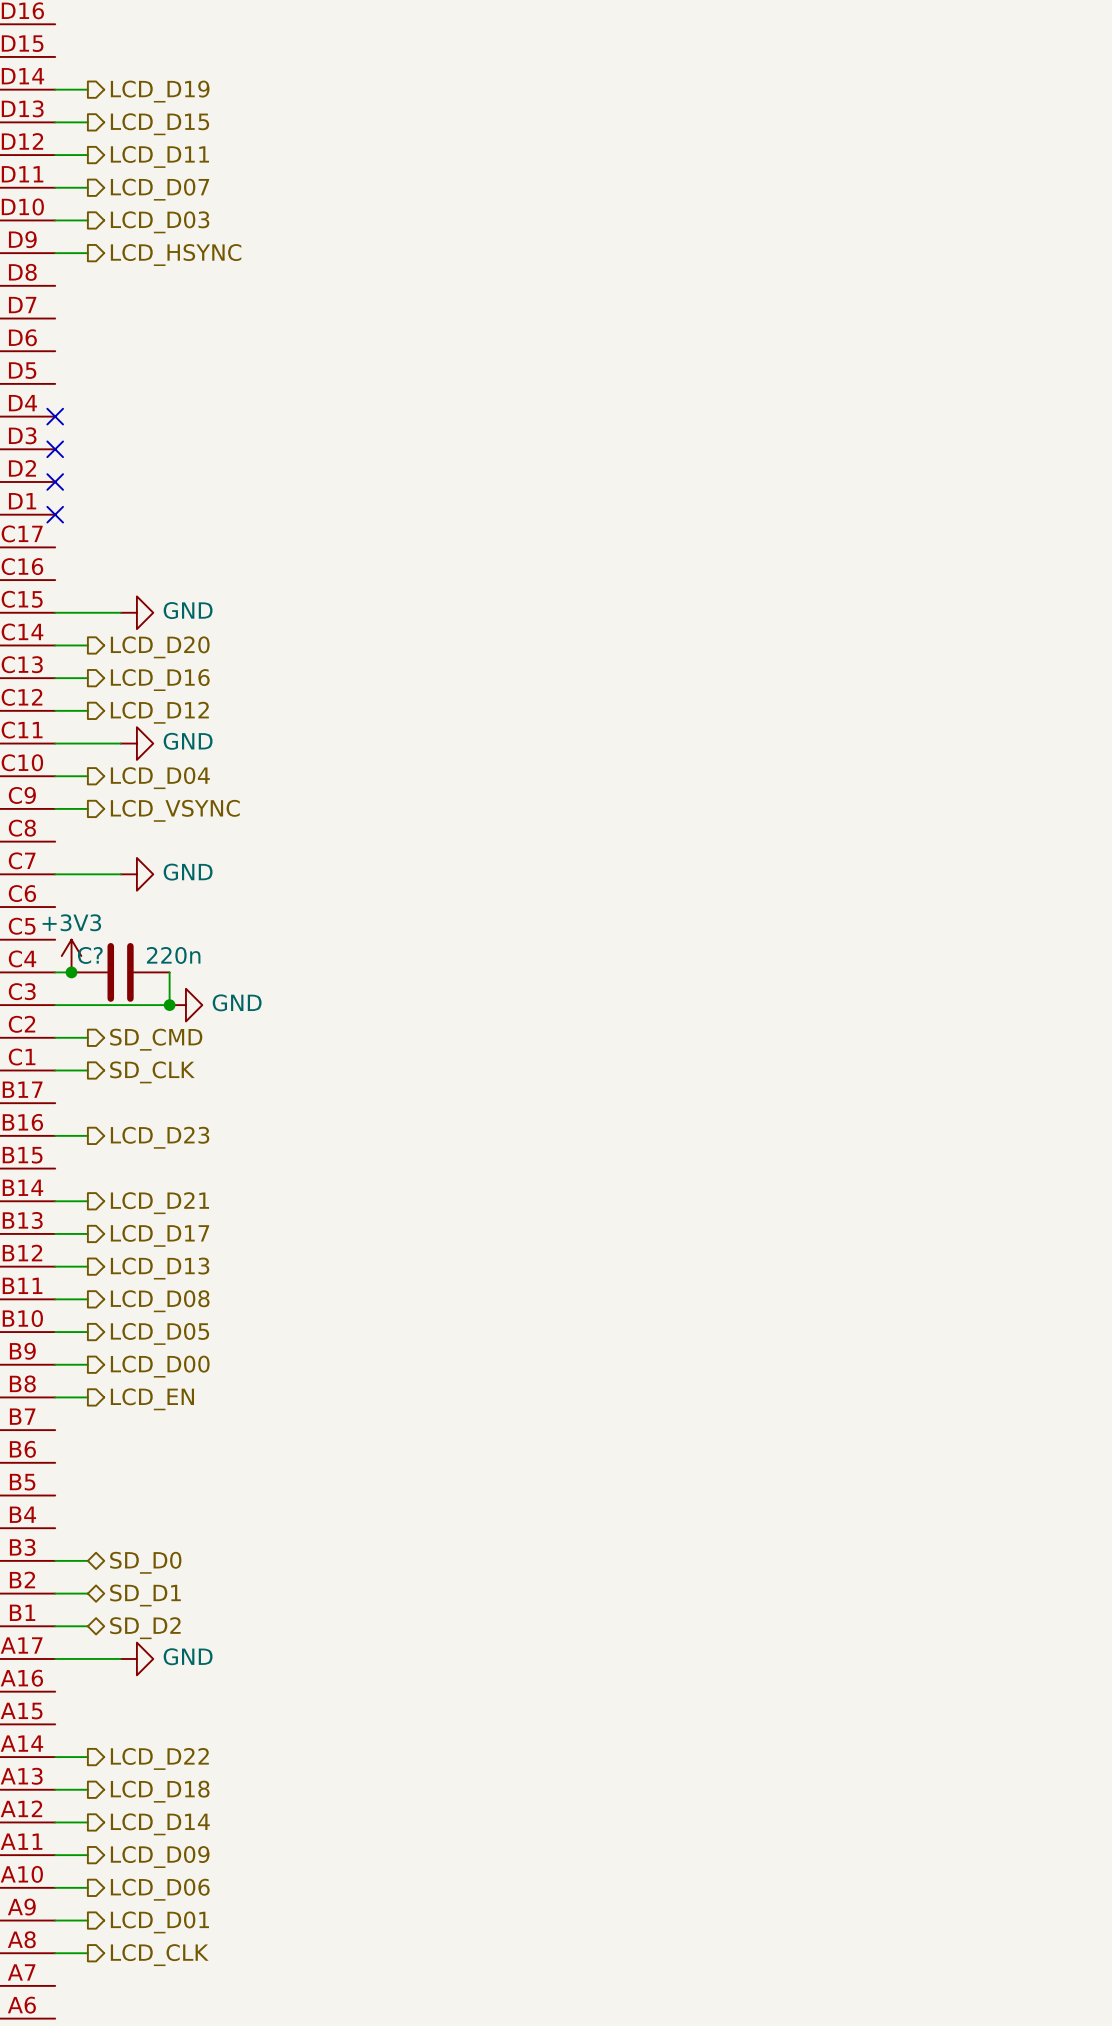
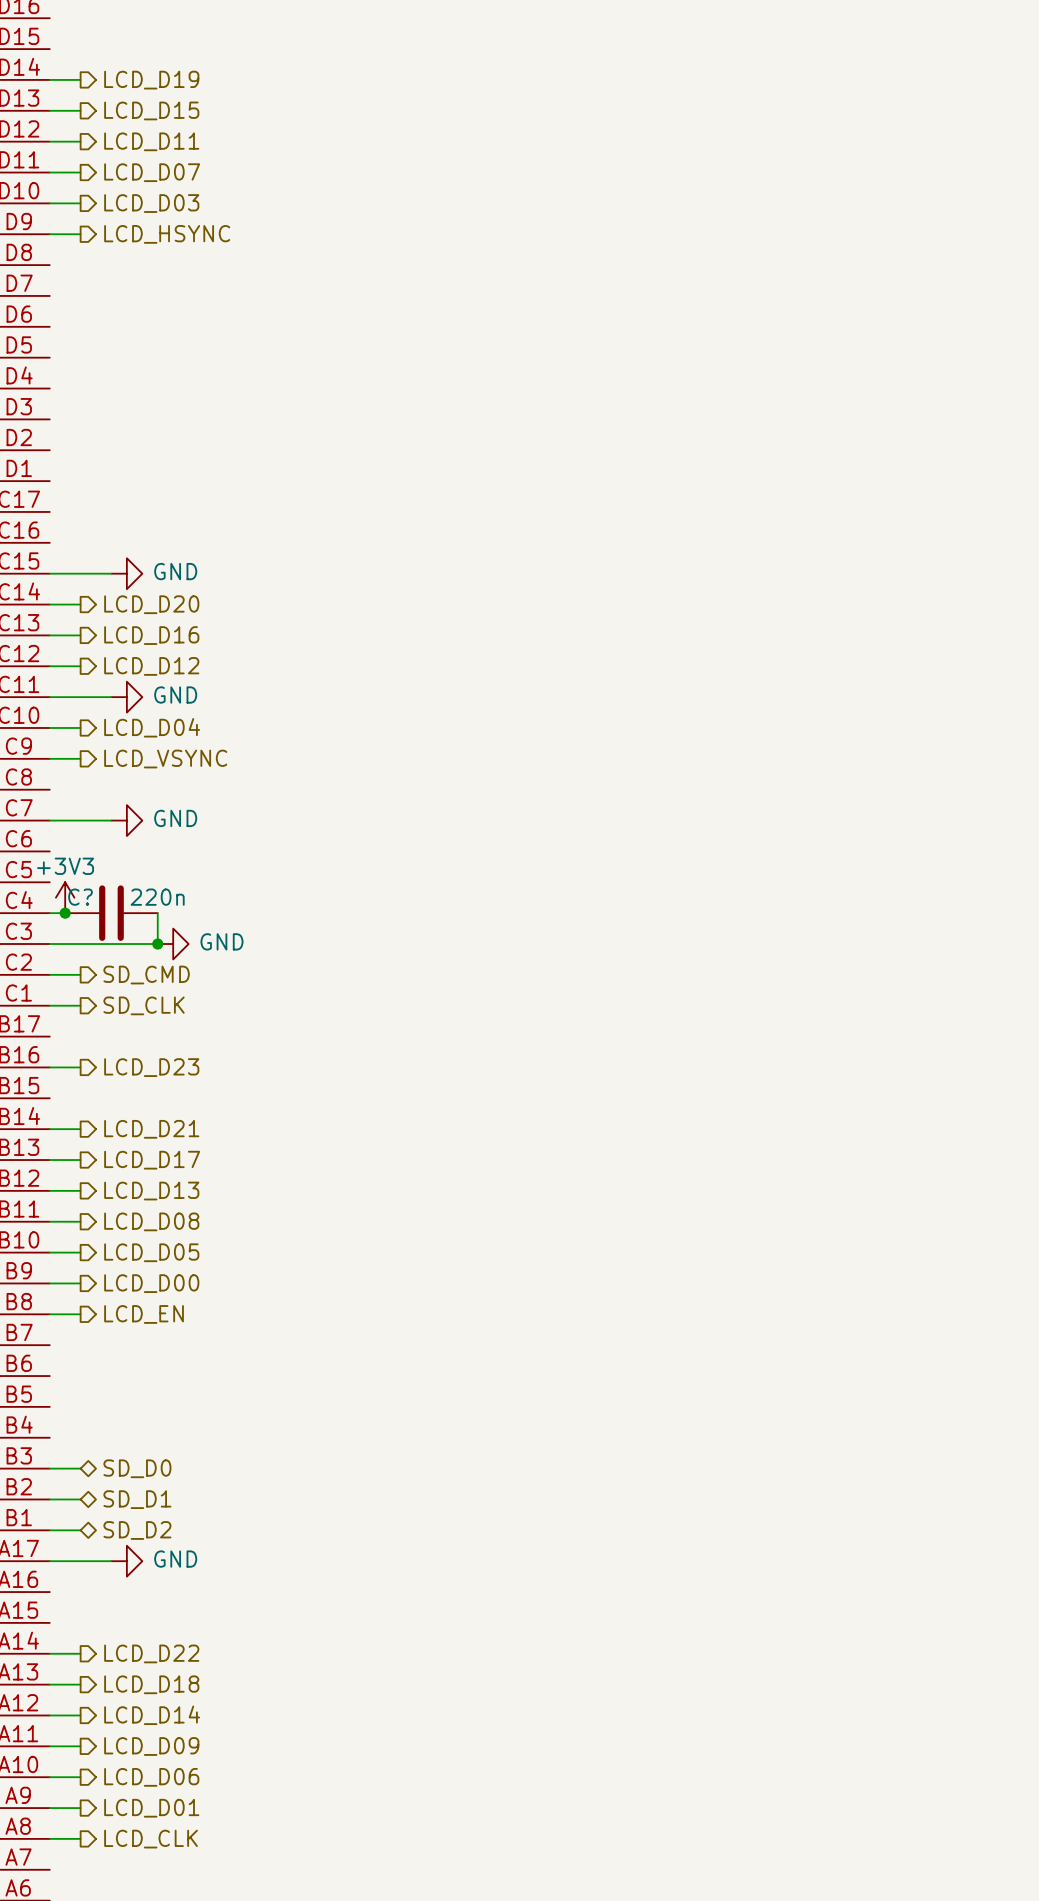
no-connect mark: (55, 416) -> none
no-connect mark: (55, 449) -> none
no-connect mark: (55, 481) -> none
no-connect mark: (55, 514) -> none

